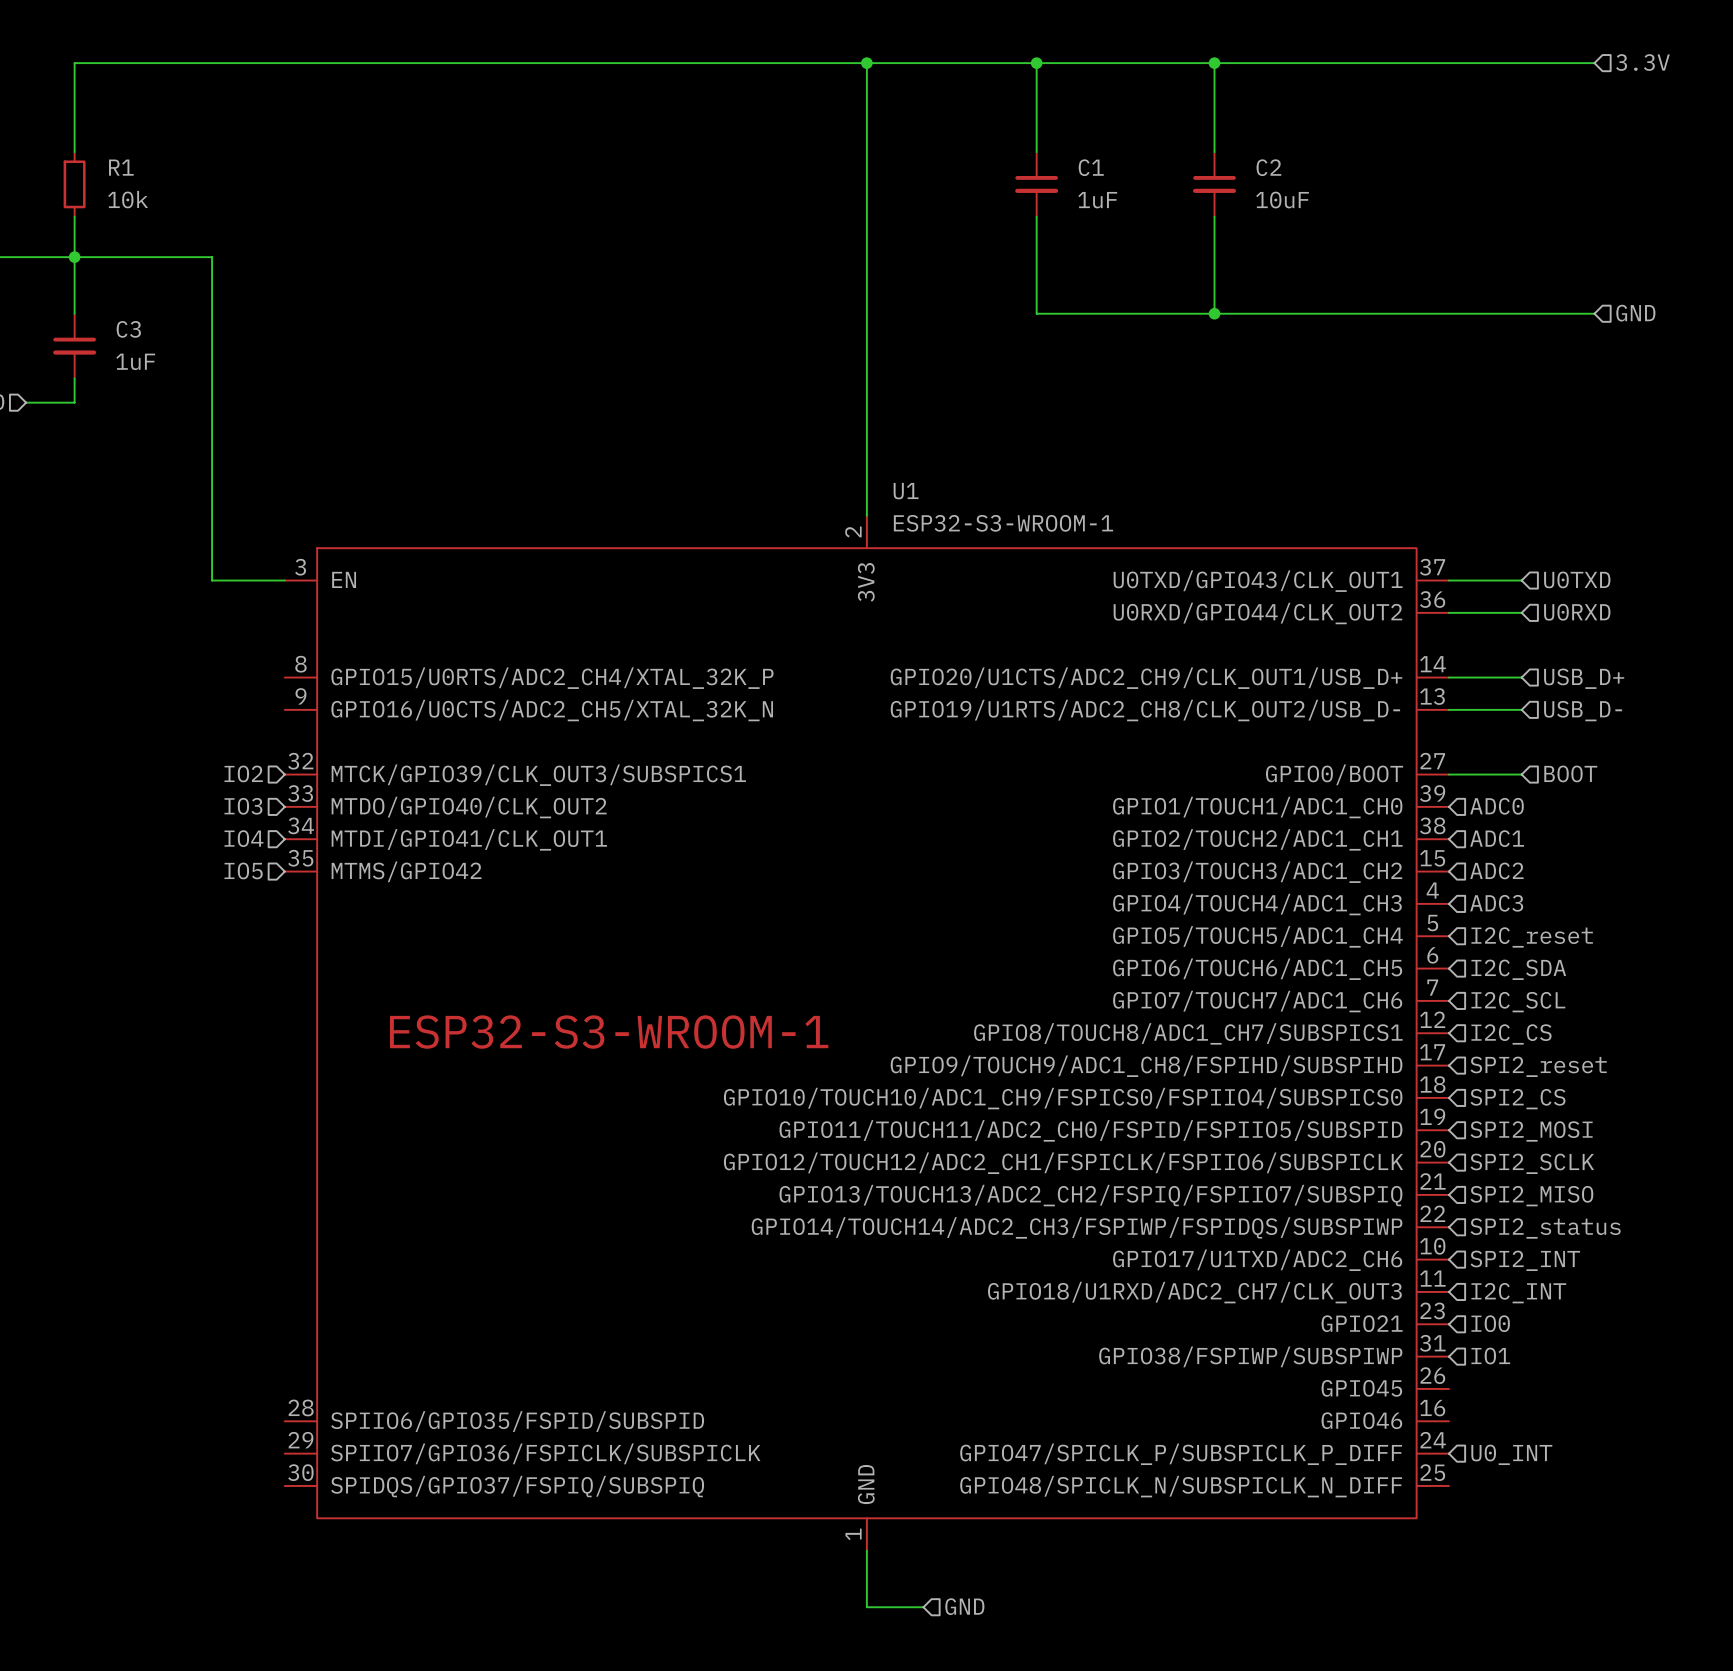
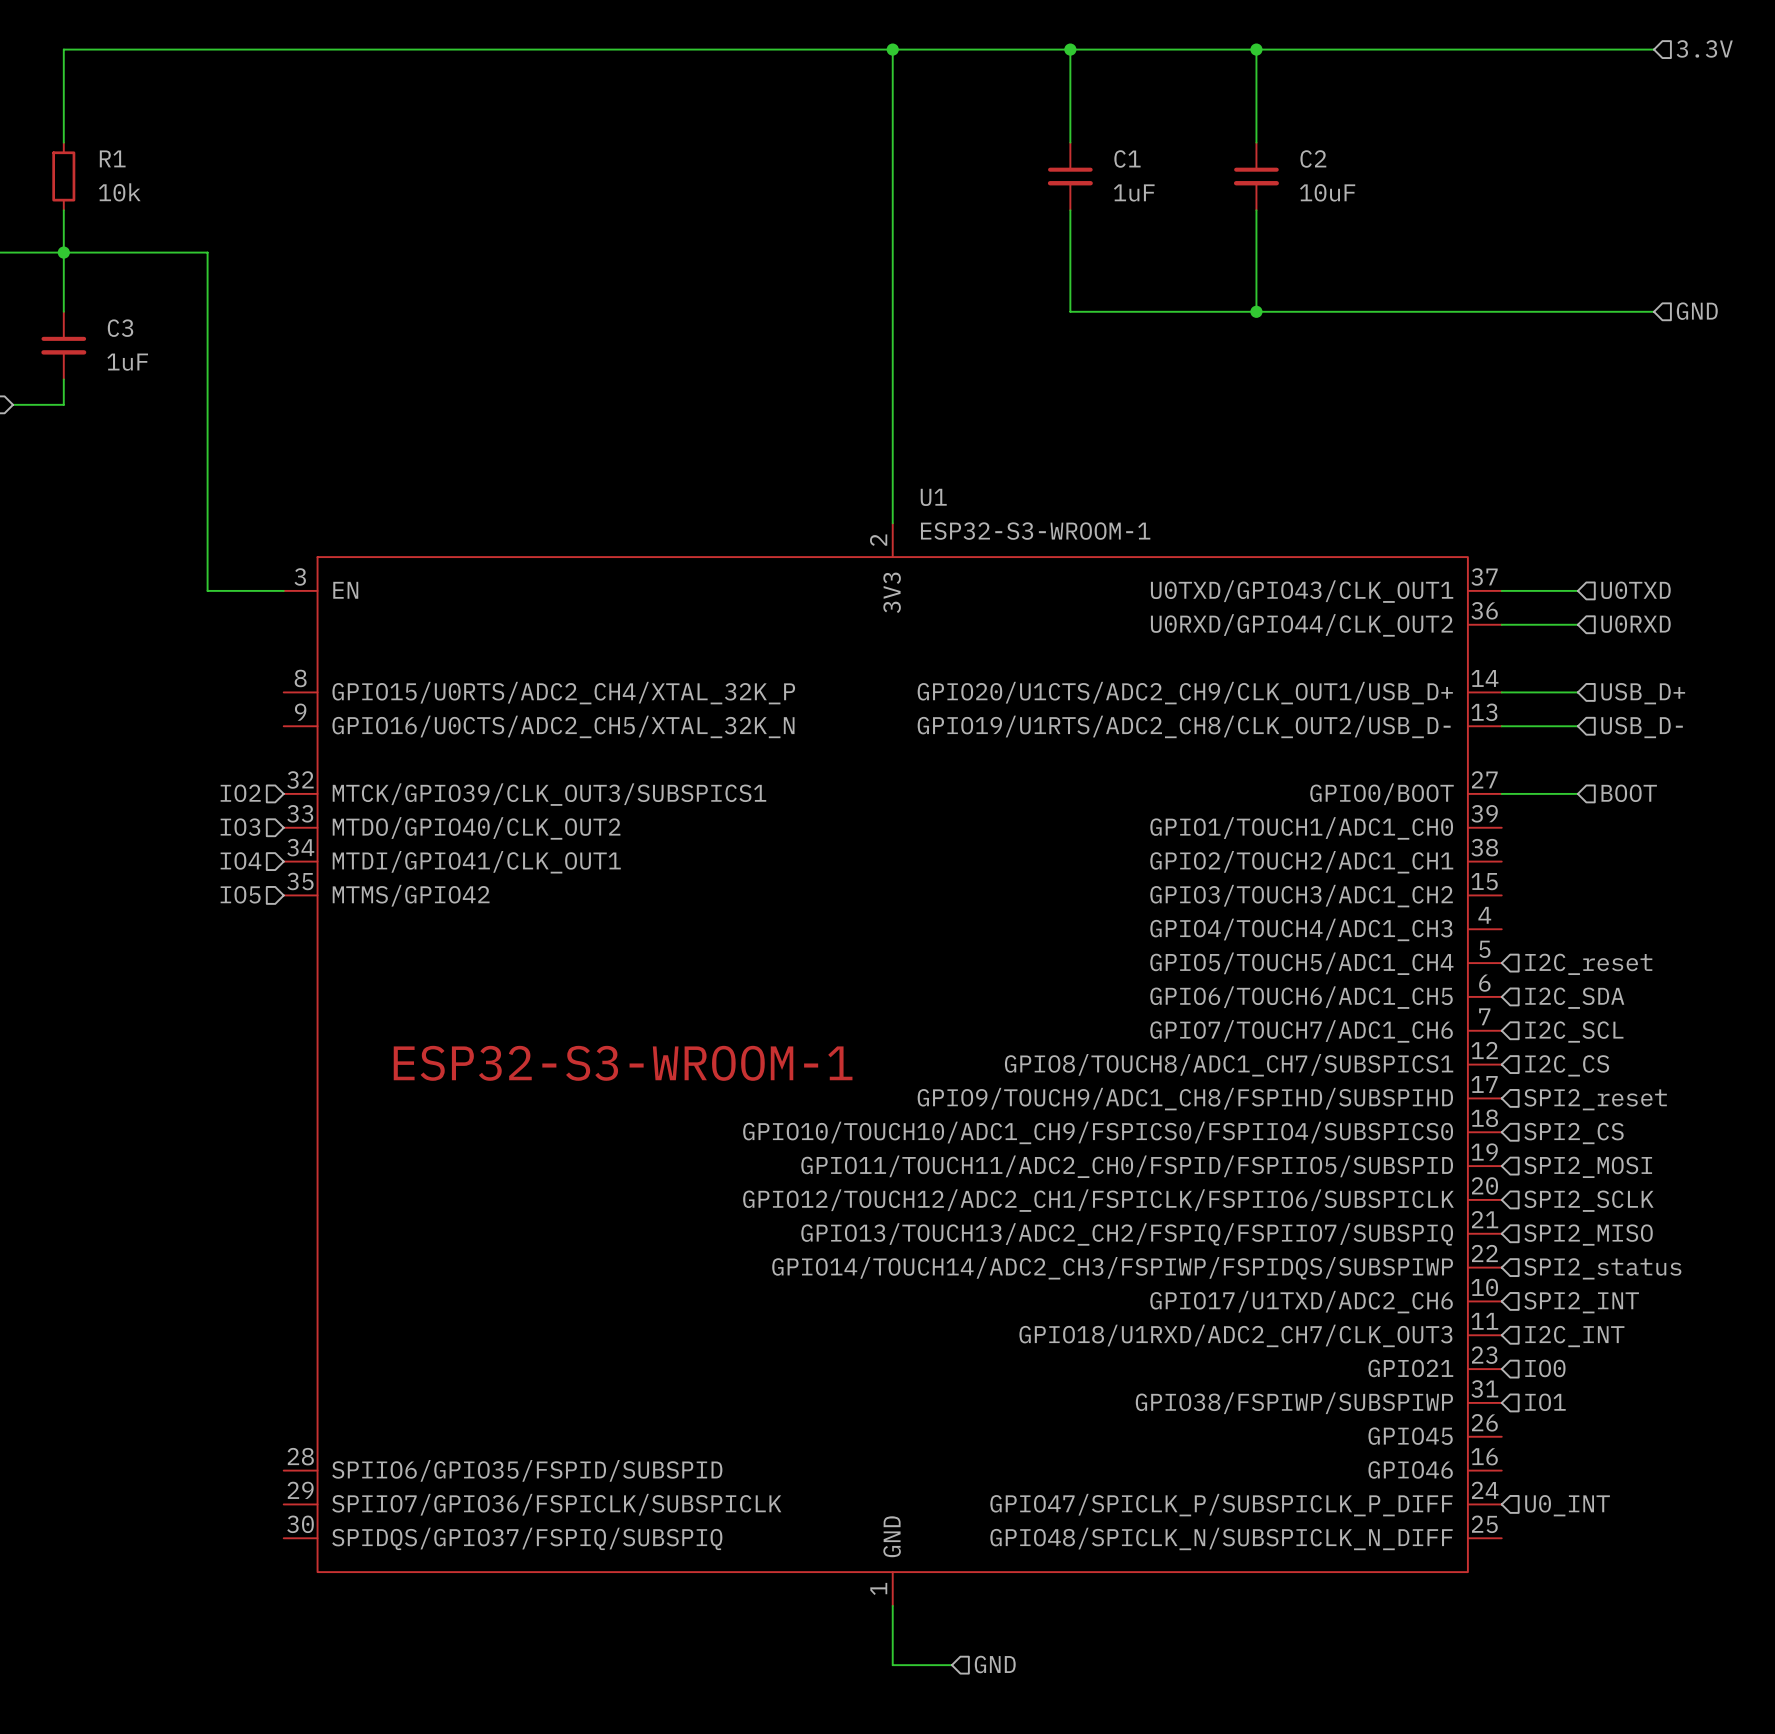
hierarchical label: ADC0 (1497, 806) -> none
hierarchical label: ADC1 (1497, 838) -> none
hierarchical label: ADC2 (1496, 870) -> none
hierarchical label: ADC3 (1496, 903) -> none

